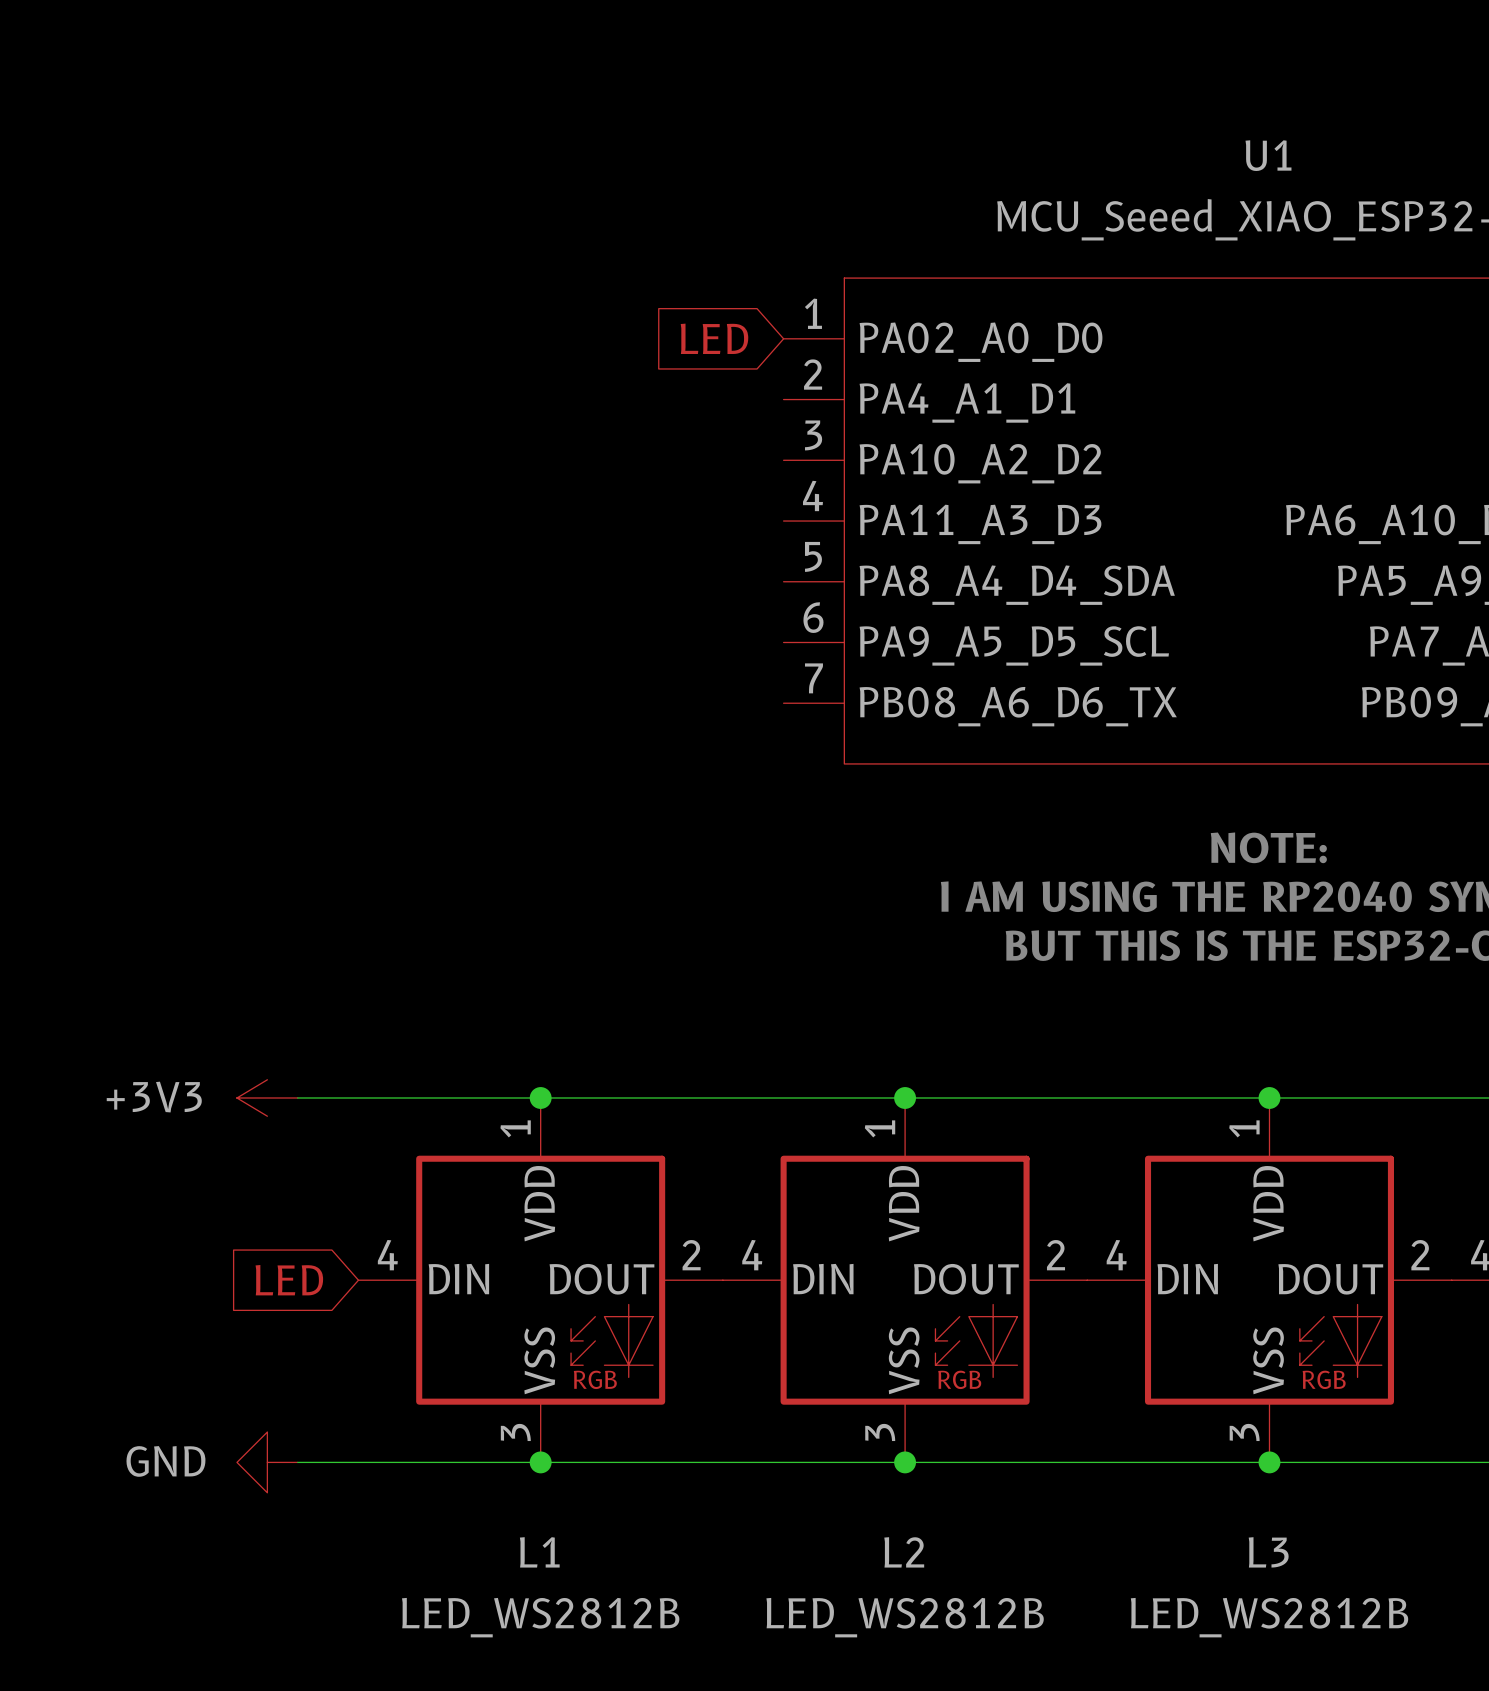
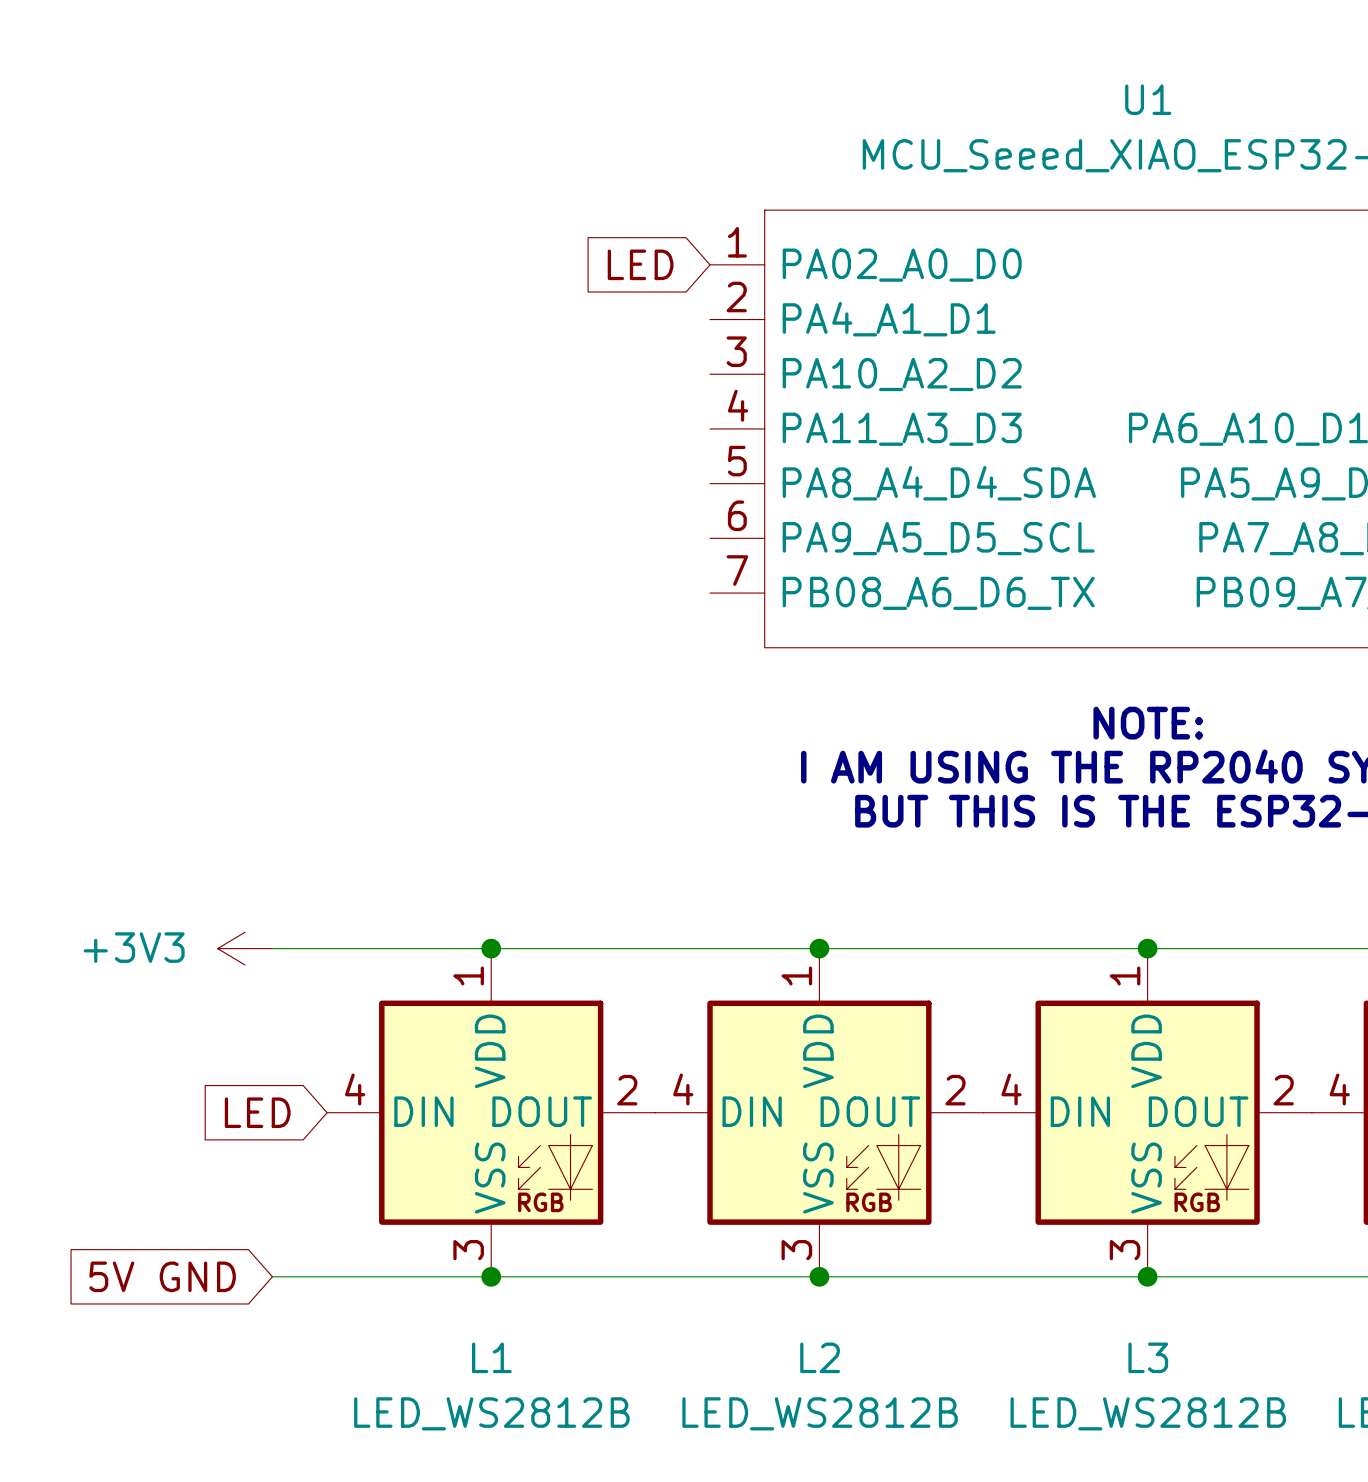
global label: none -> 5V GND (162, 1276)
power symbol: GND (267, 1462) -> none

